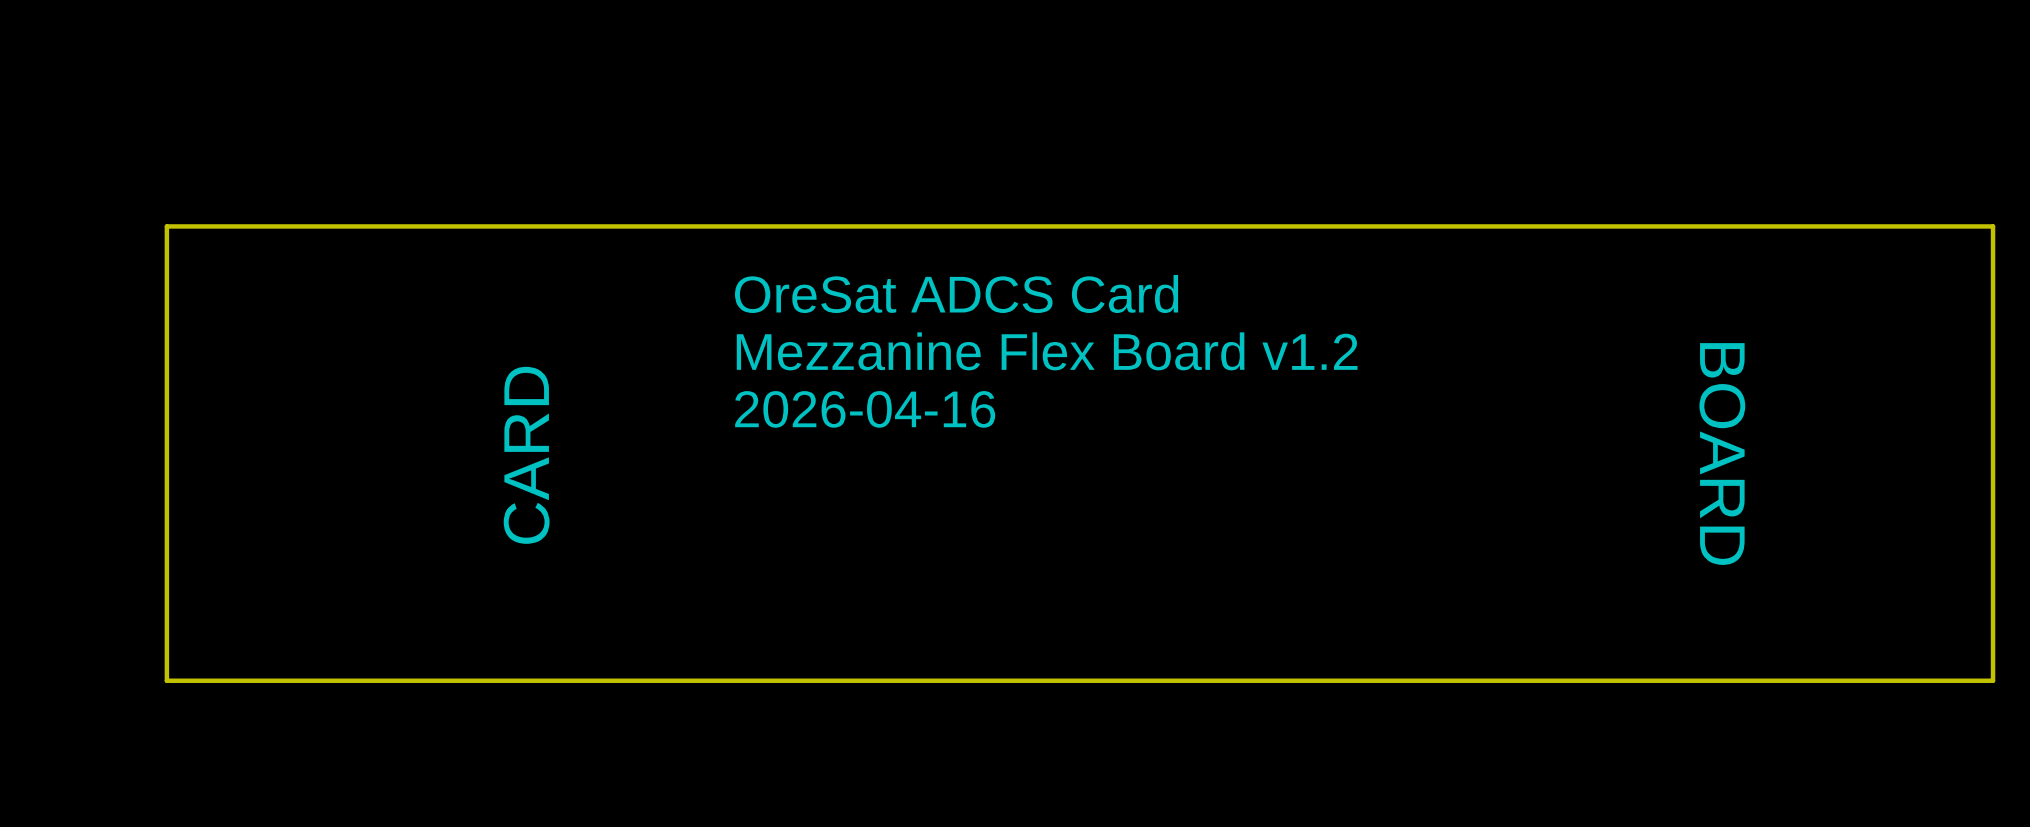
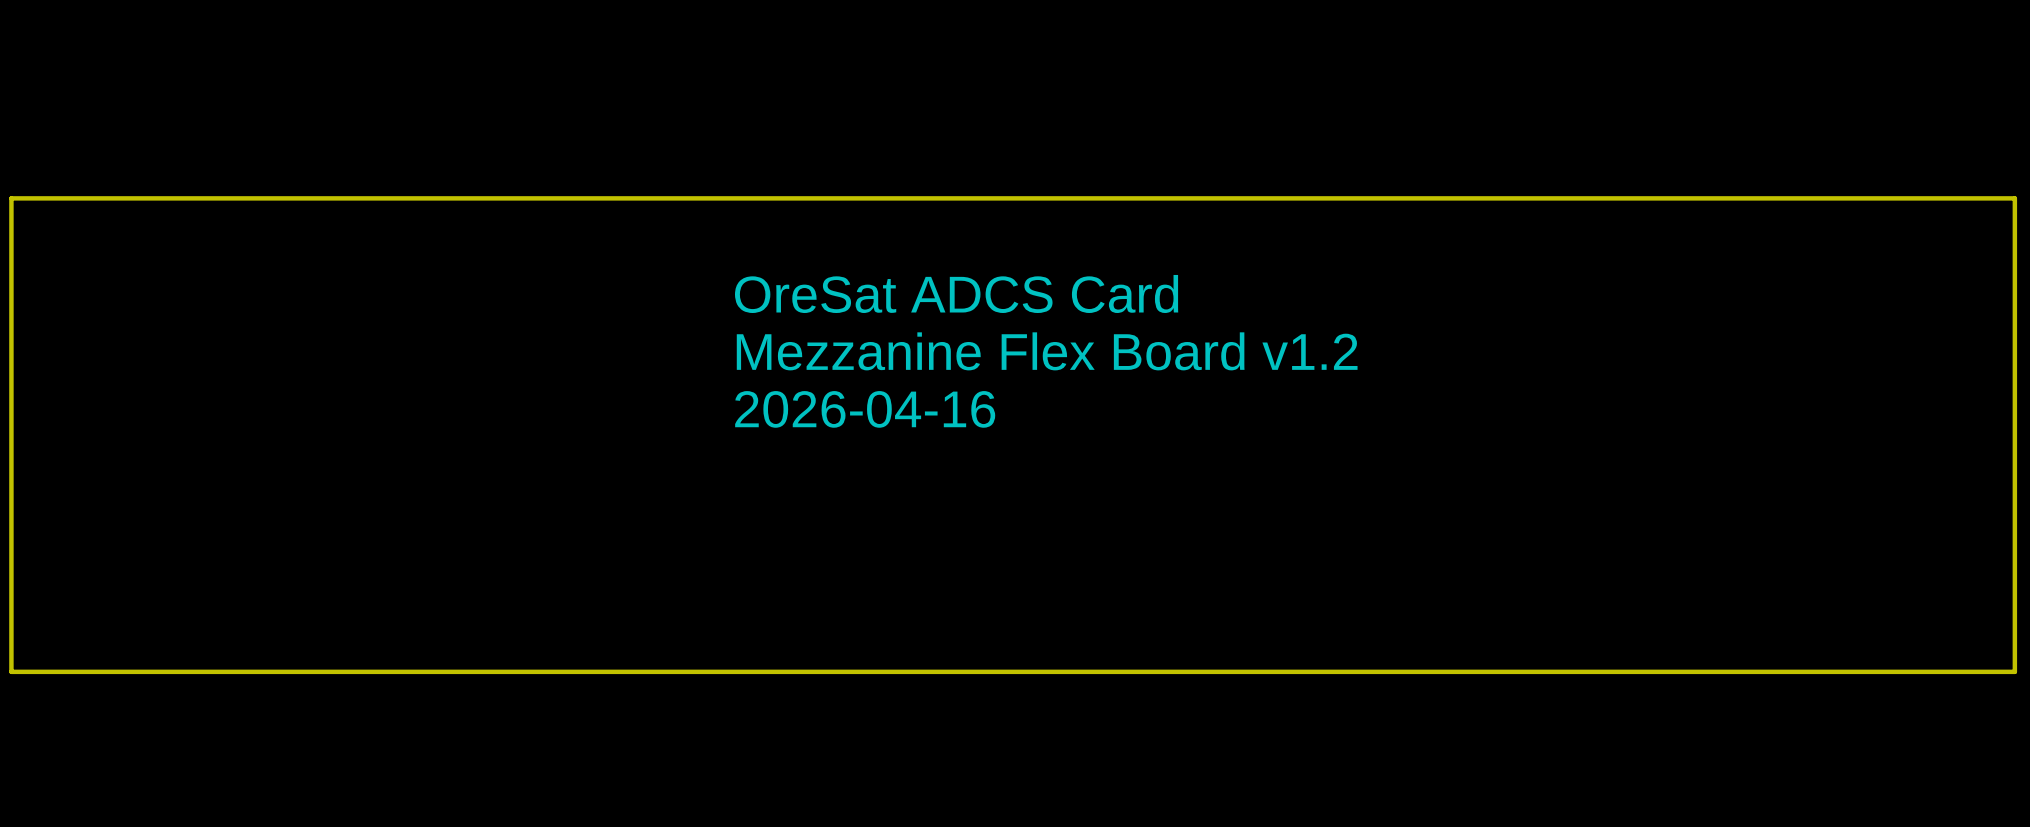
board edge: (166, 226) (1993, 226) (1993, 680) (166, 680) (166, 226) -> (11, 198) (11, 671) (2014, 671) (2014, 198) (11, 198)
text: BOARD (1722, 454) -> none
text: CARD (526, 455) -> none

